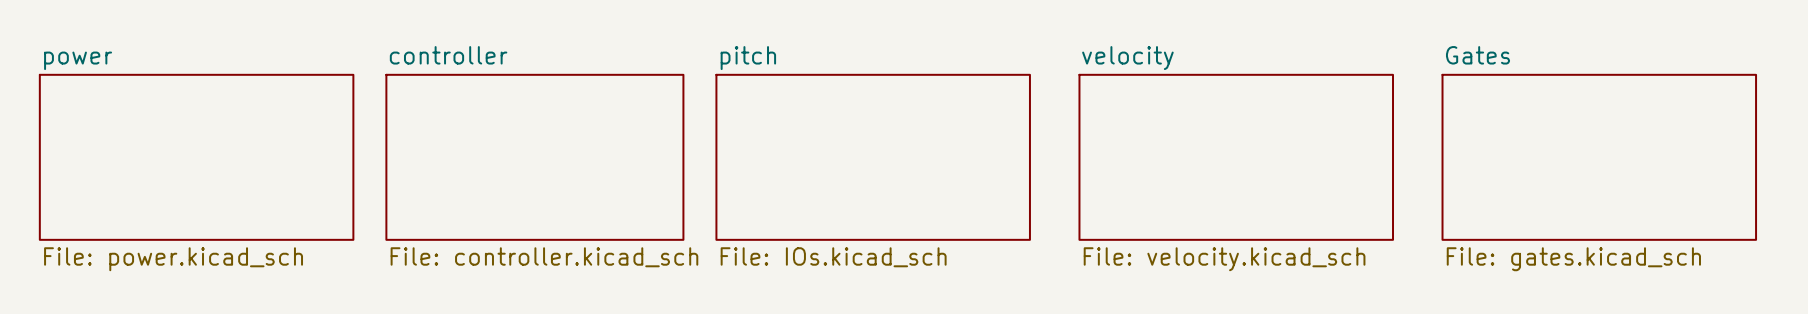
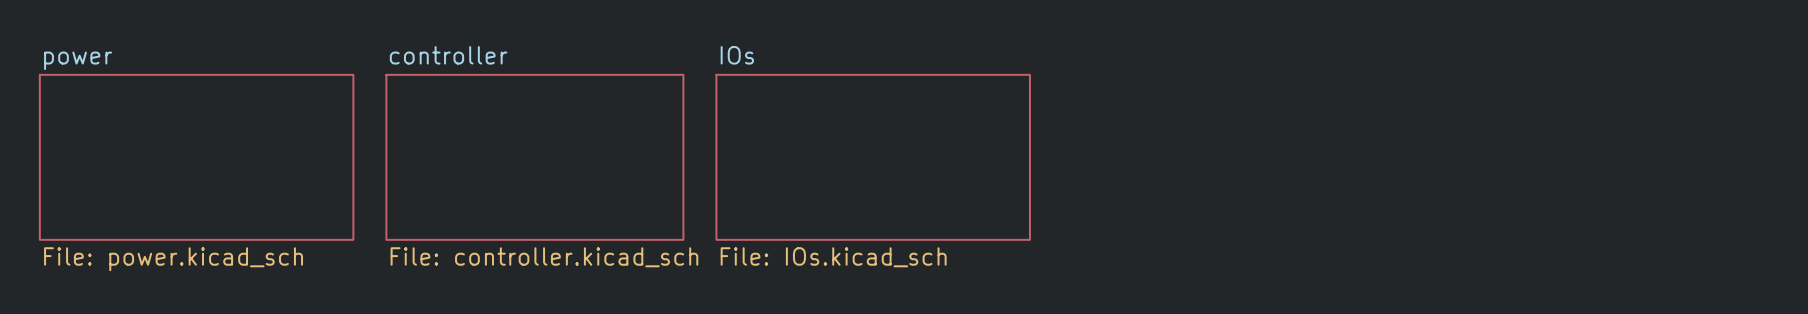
sheet pitch name: pitch (748, 58) -> IOs (737, 55)
sheet velocity: File: velocity.kicad_sch (1236, 157) -> none
sheet Gates: File: gates.kicad_sch (1599, 157) -> none

